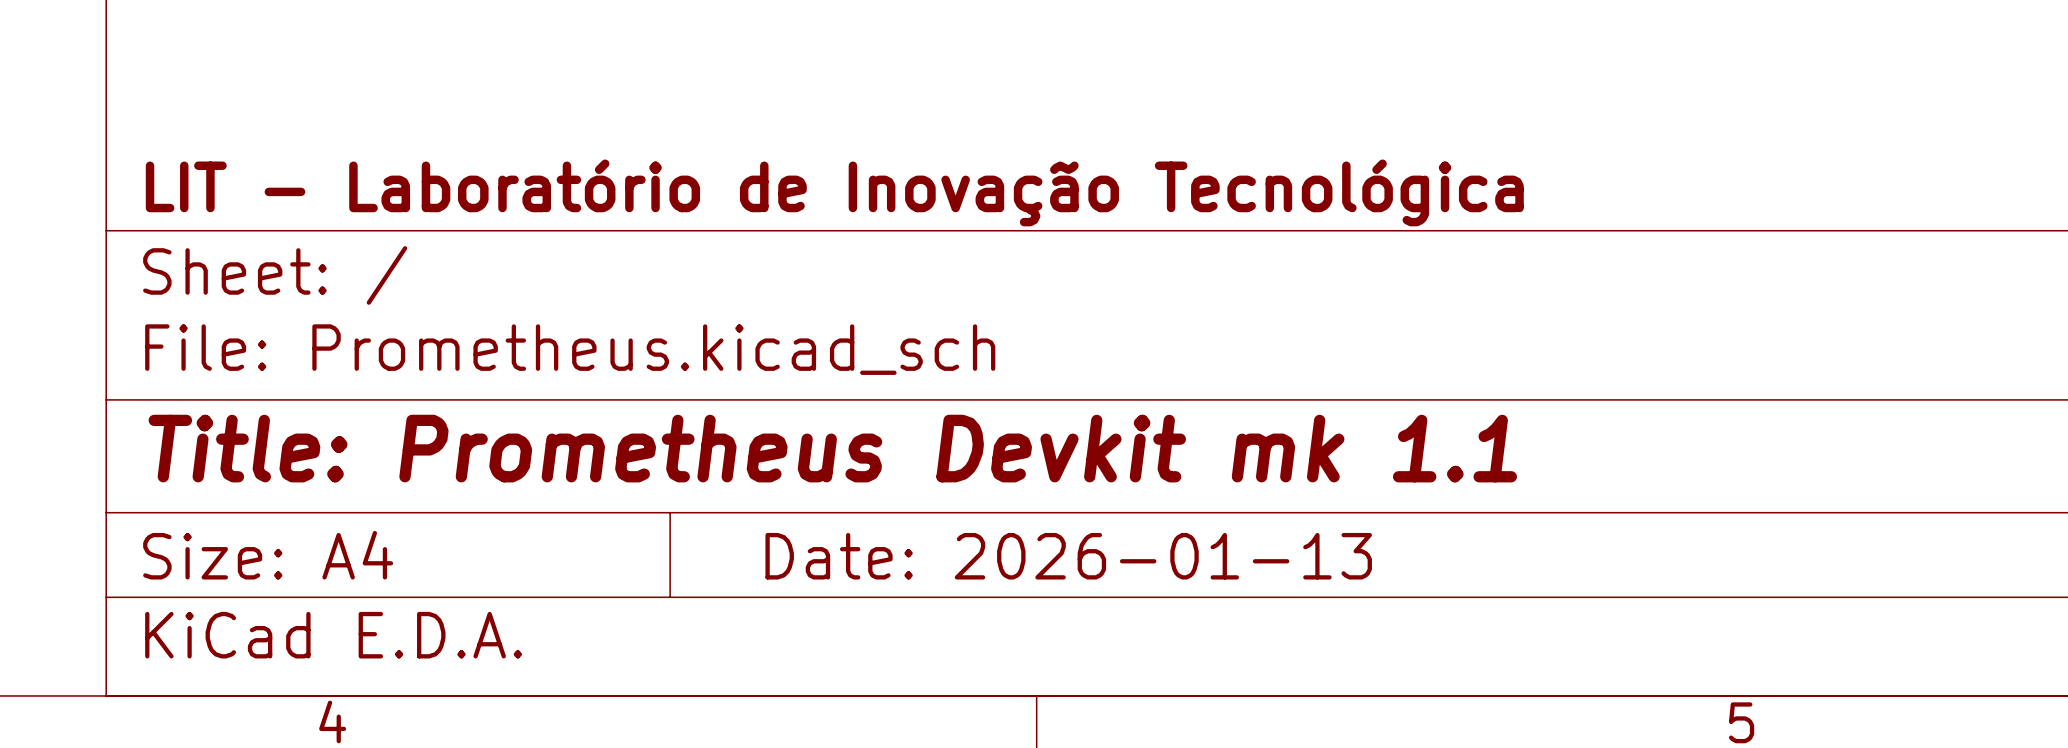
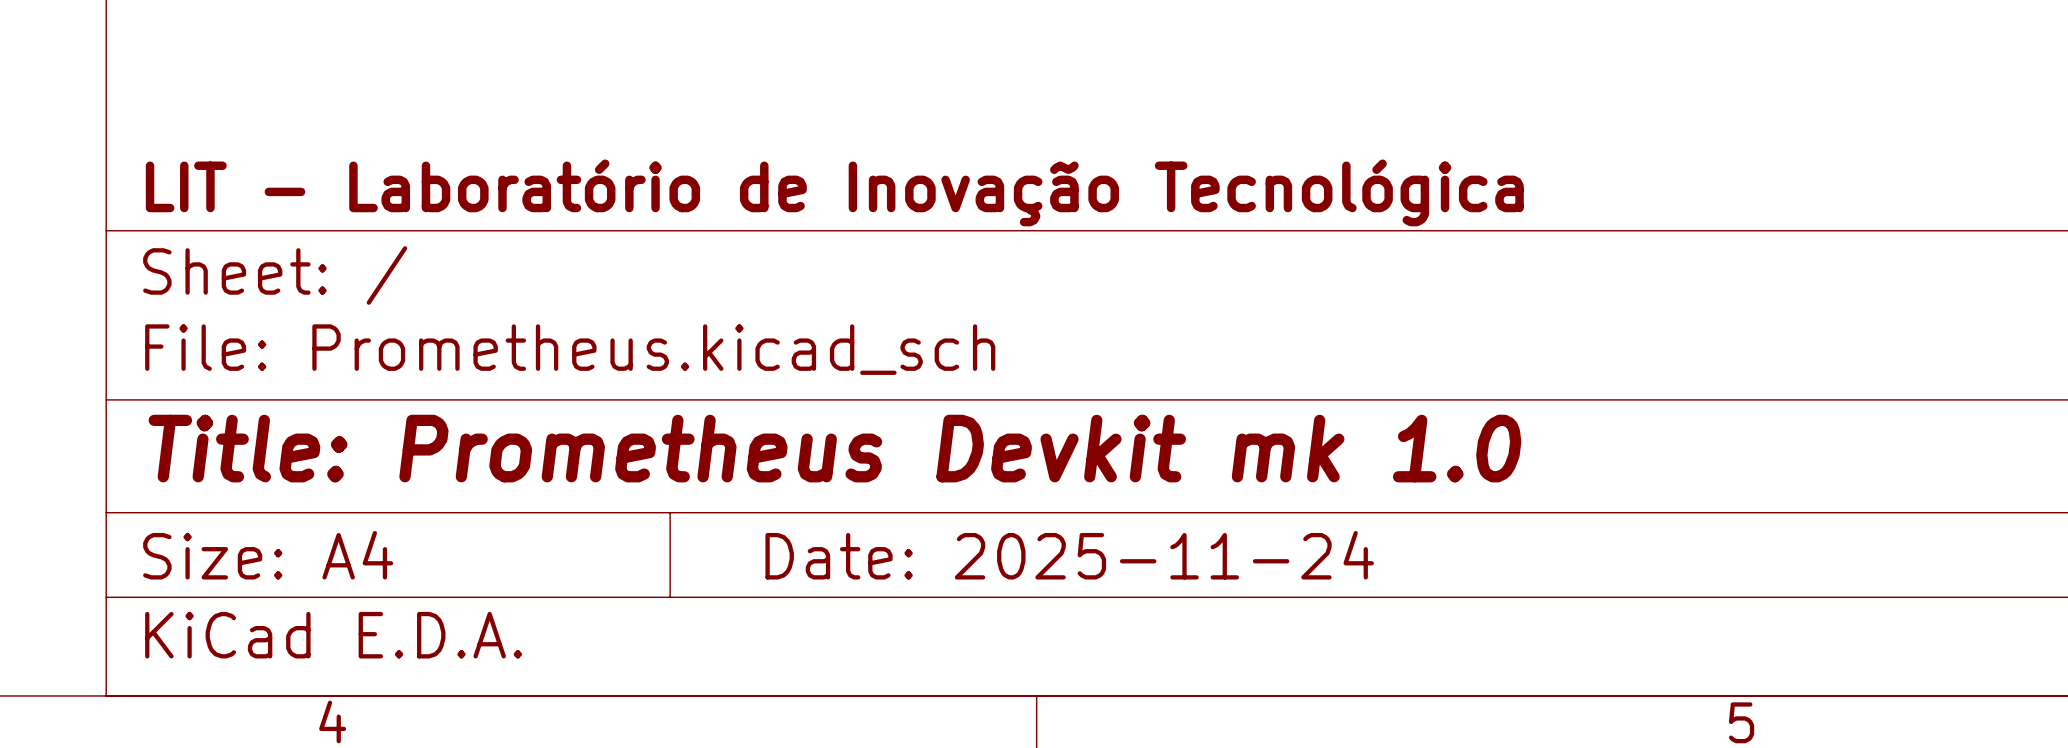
title block: Title: Prometheus Devkit mk 1.1 (832, 448) -> Title: Prometheus Devkit mk 1.0 (834, 448)
title block: Date: 2026-01-13 (1068, 556) -> Date: 2025-11-24 (1069, 555)

